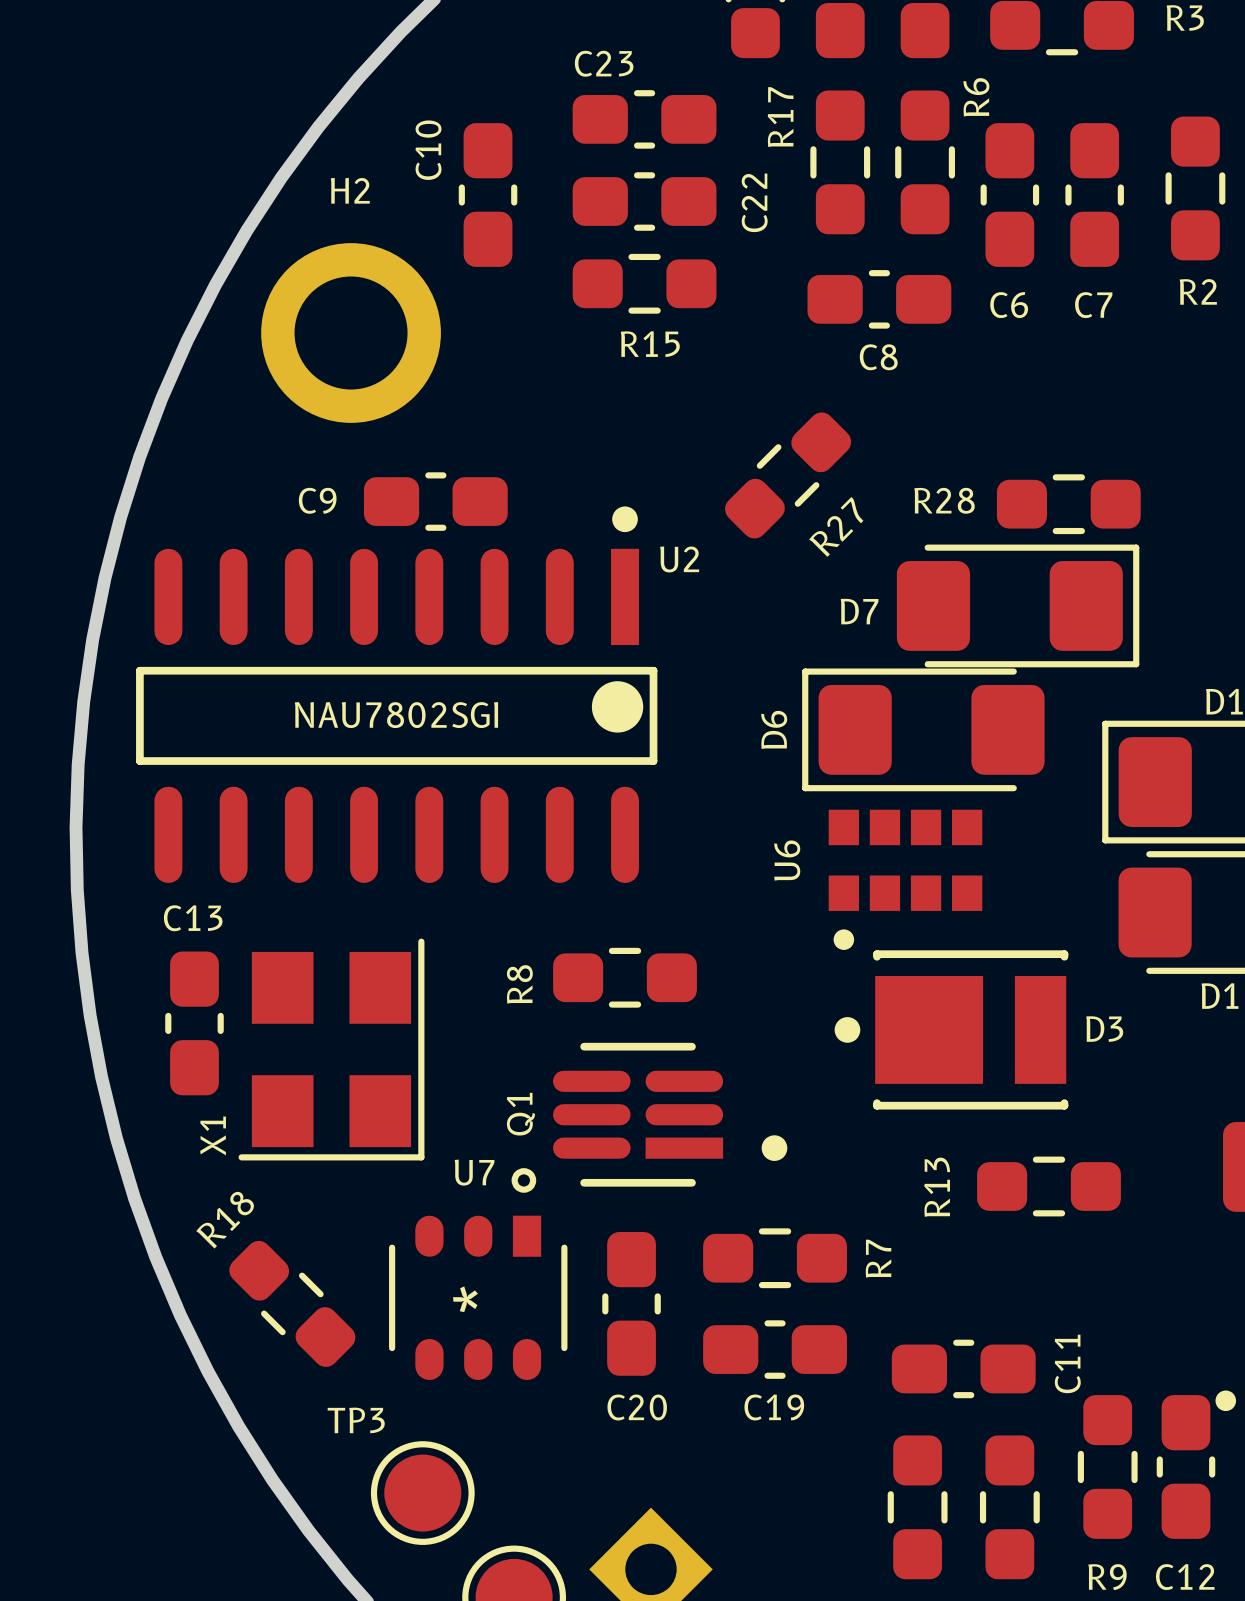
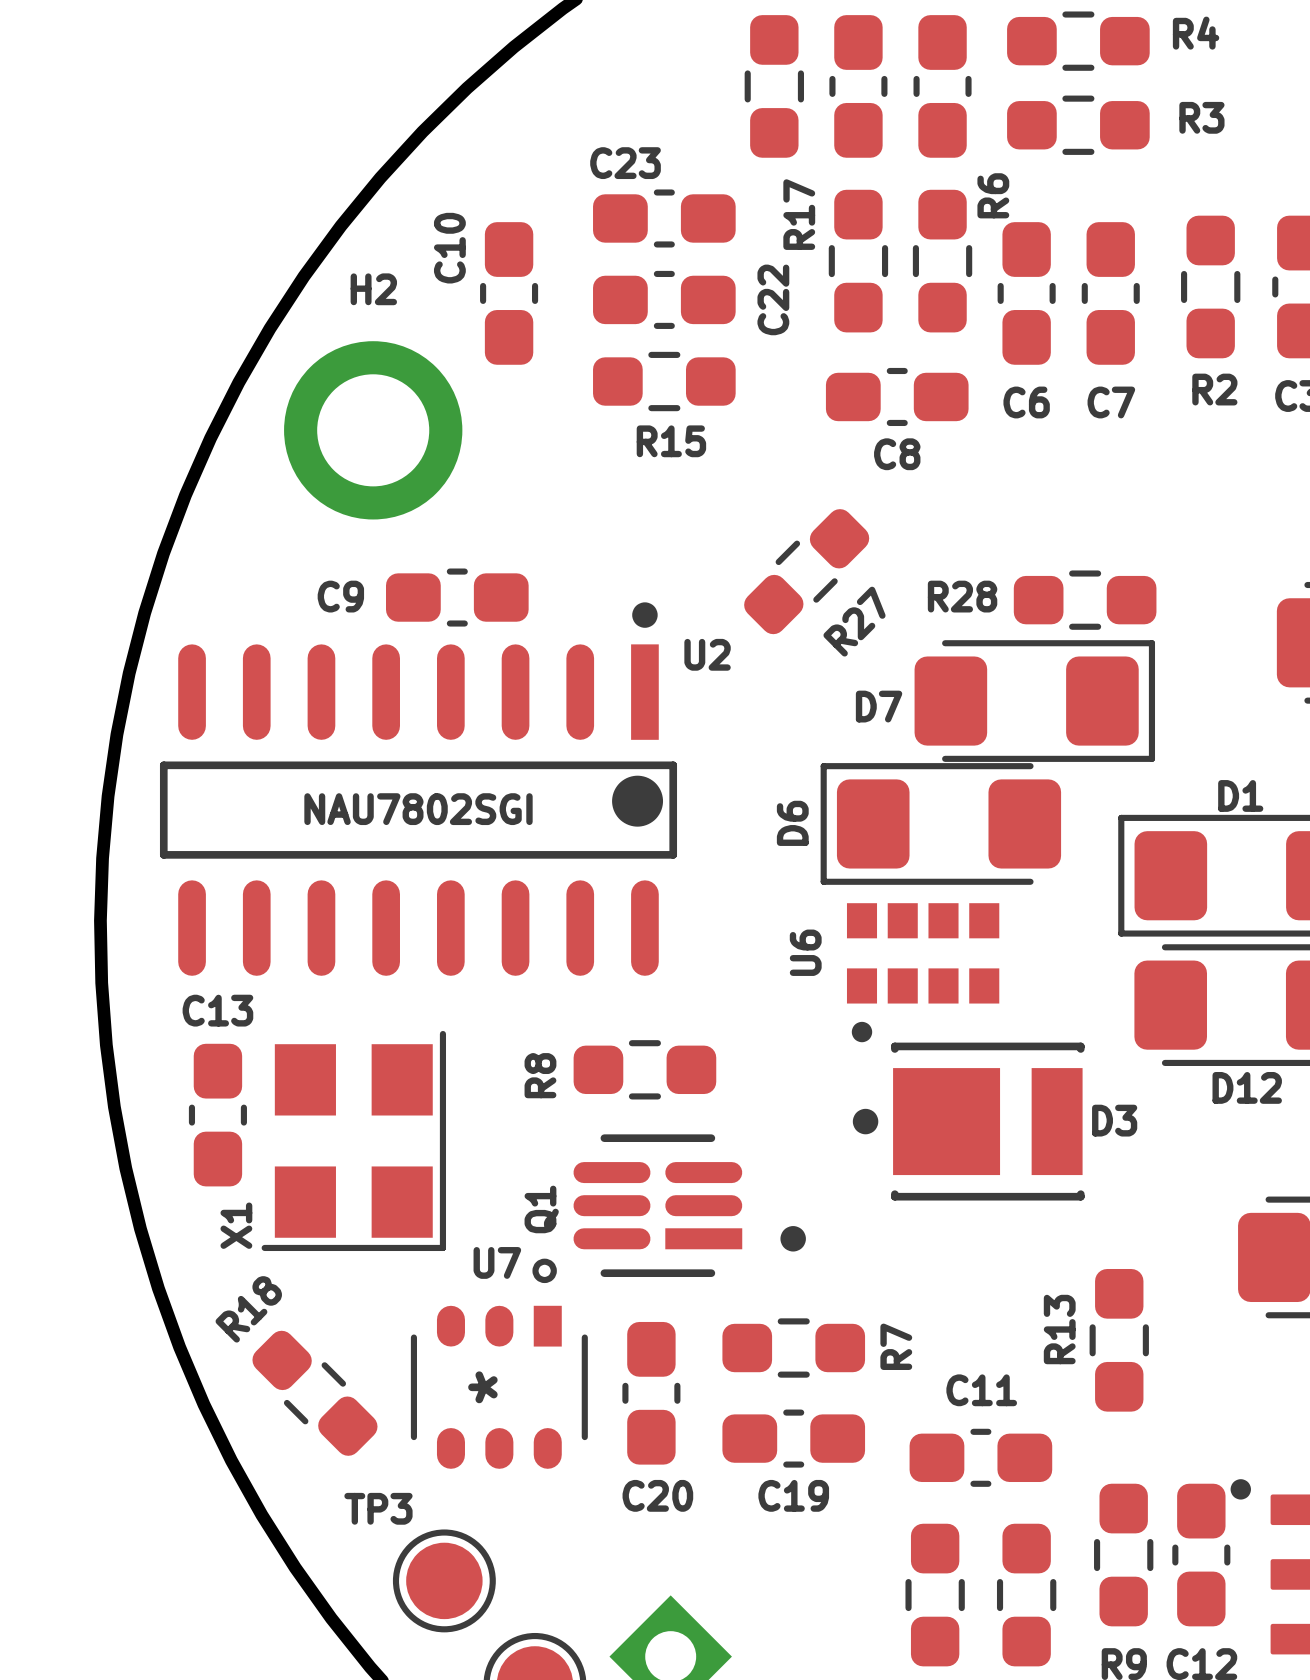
R13 rotation: 0° (1049, 1186) -> 90° clockwise (1119, 1340)
C11 name rotation: 0° (1067, 1363) -> 90° clockwise (981, 1390)
C11 name position: C11 (1067, 1363) -> C11 (981, 1390)

